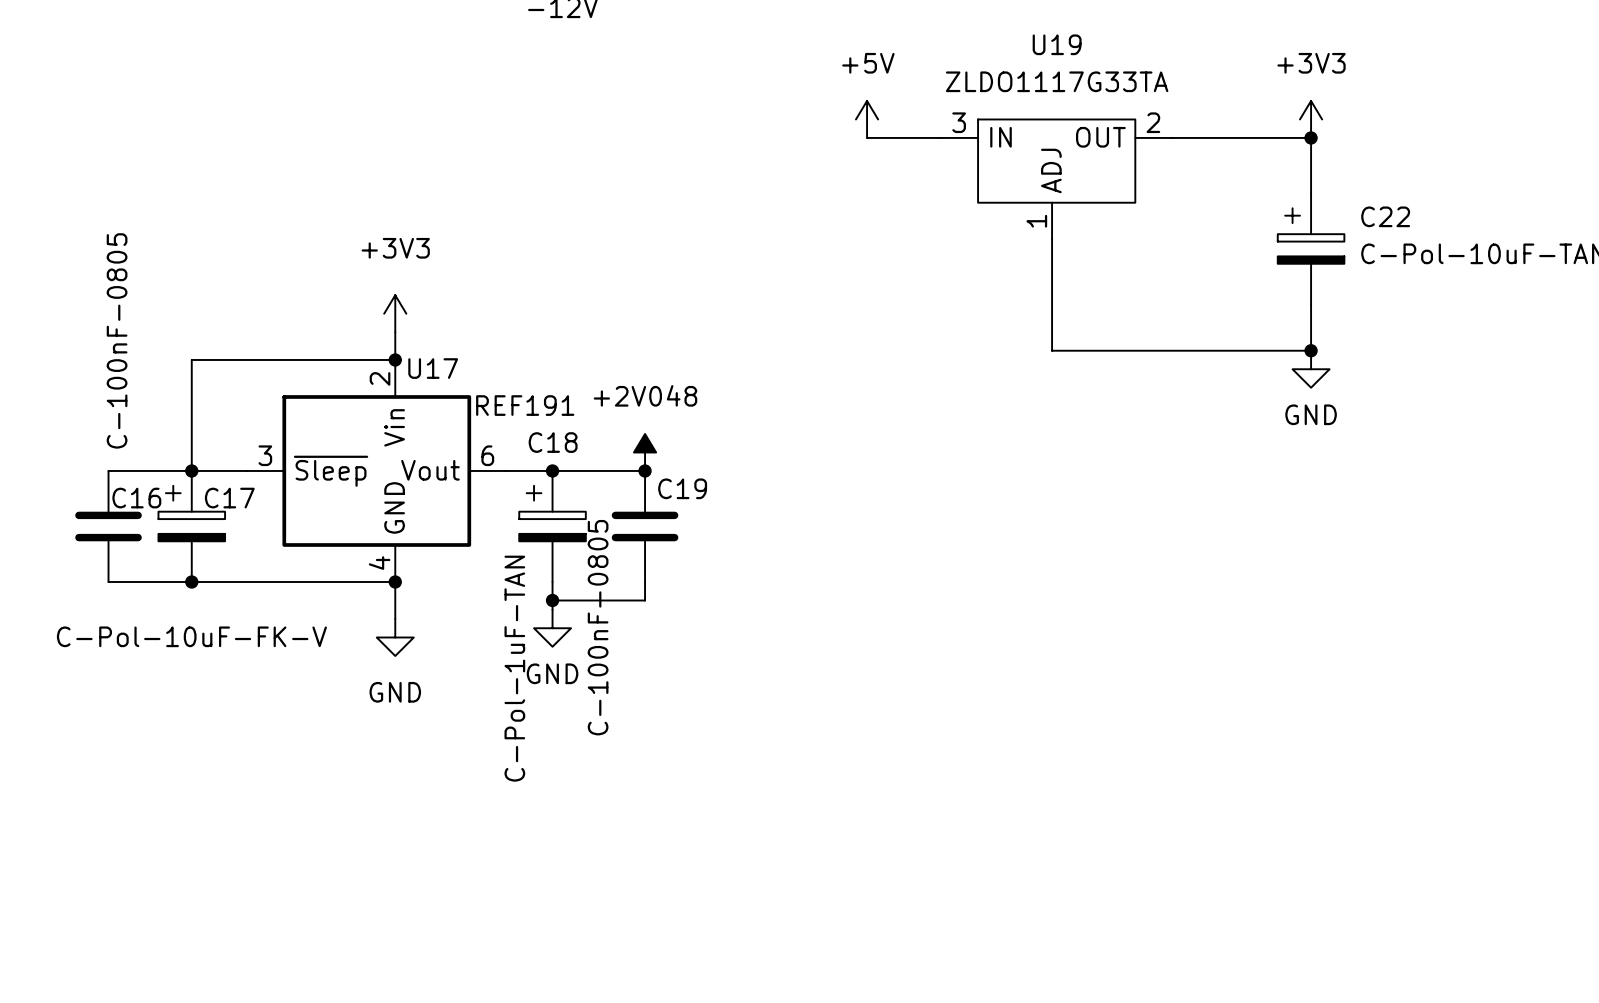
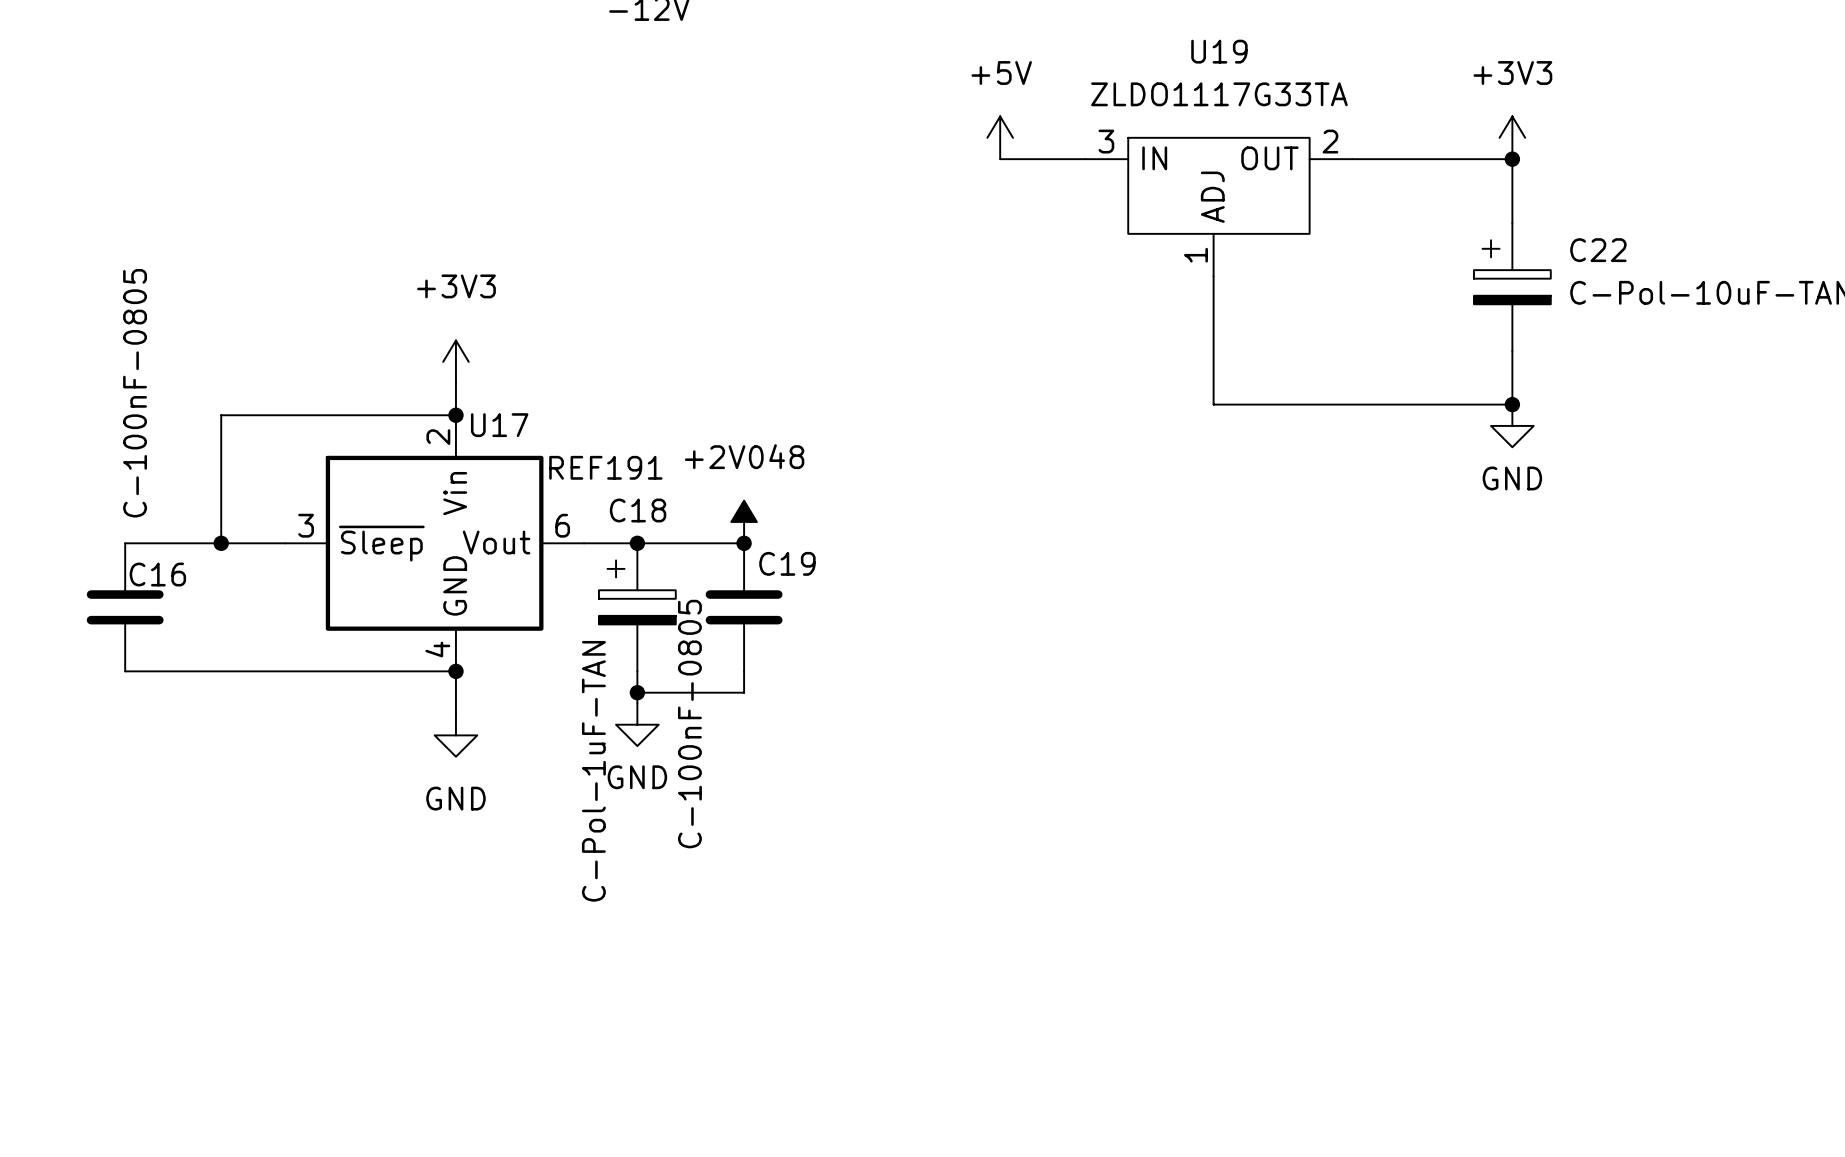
C17: C-Pol-10uF-FK-V (191, 526) -> none
junction: (191, 581) -> none

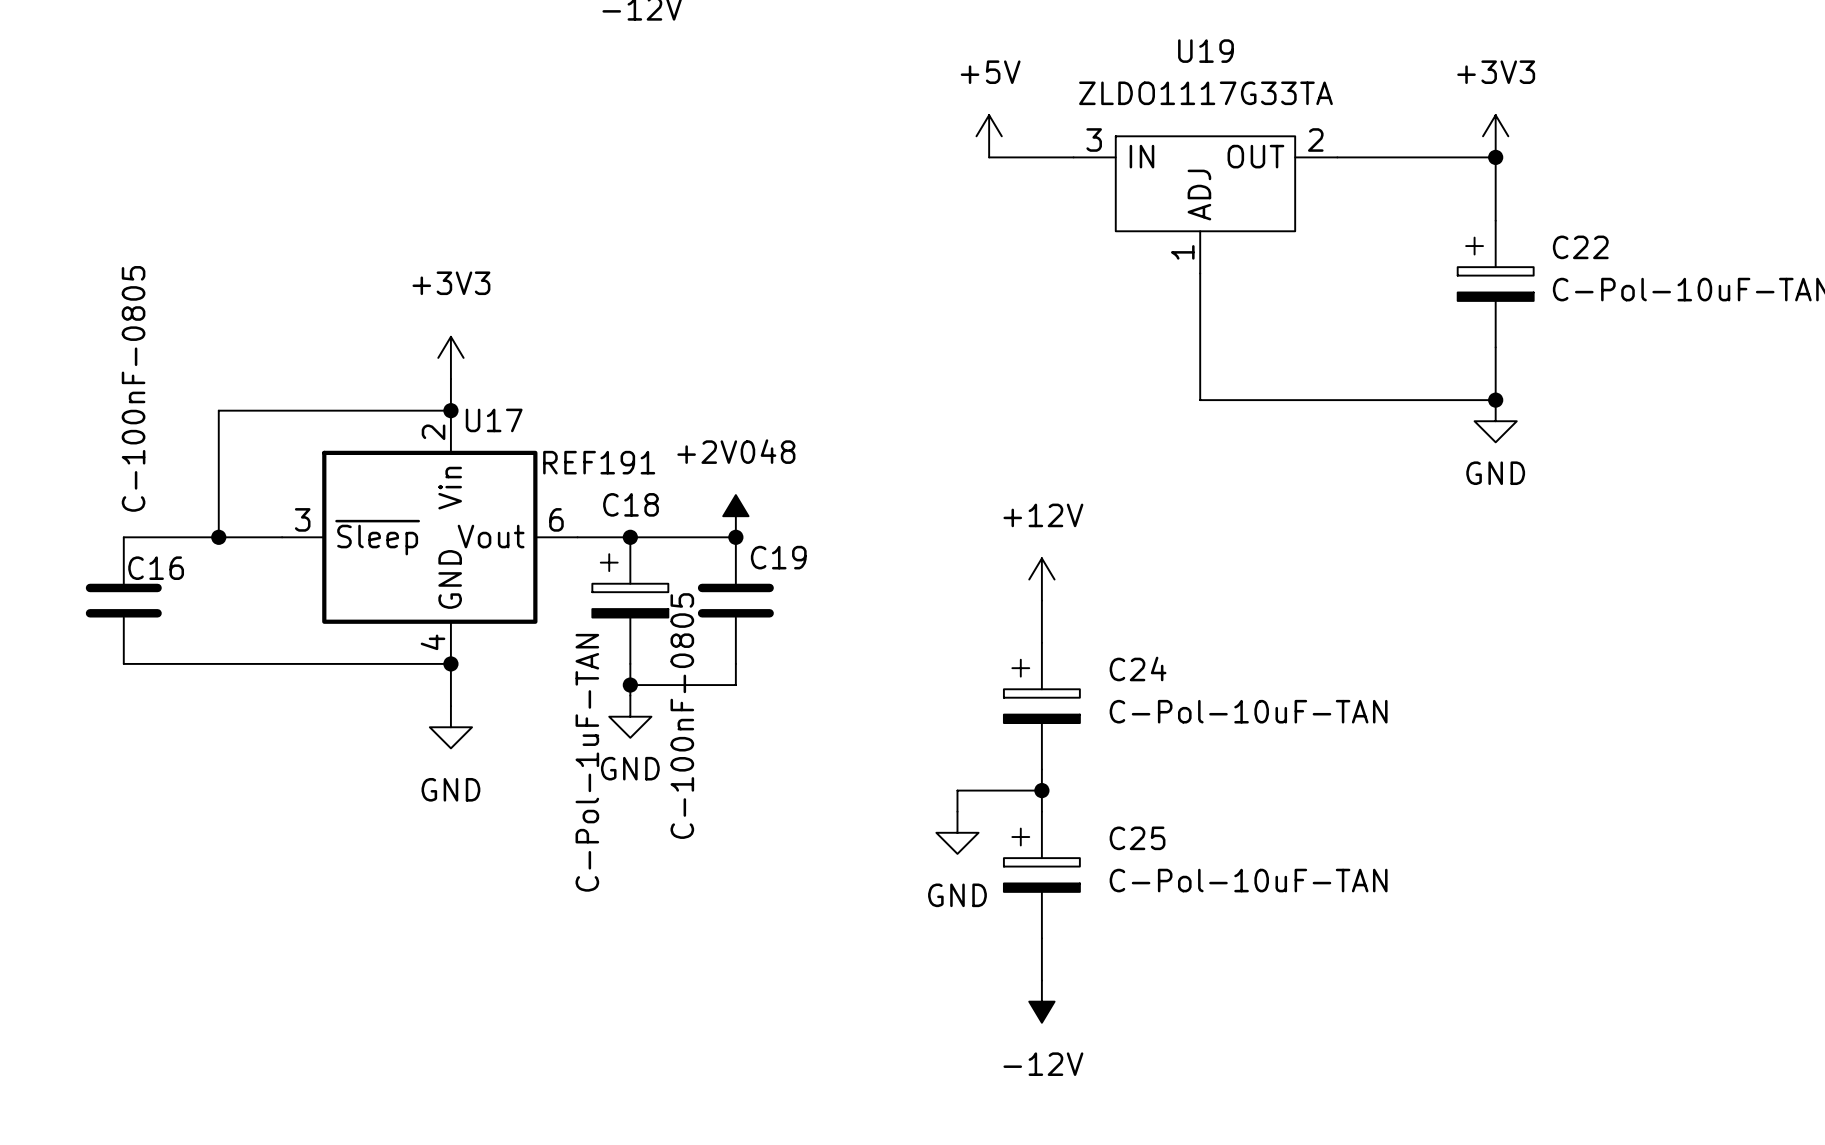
power symbol: none -> +12V (1041, 579)
wire: none -> (1041, 600) (1041, 642)
C24: none -> C-Pol-10uF-TAN (1041, 706)
wire: none -> (1041, 769) (1041, 811)
wire: none -> (1041, 790) (957, 790) (957, 811)
junction: none -> (1041, 790)
power symbol: none -> GND (957, 832)
C25: none -> C-Pol-10uF-TAN (1041, 875)
wire: none -> (1041, 938) (1041, 980)
power symbol: none -> -12V (1041, 1001)

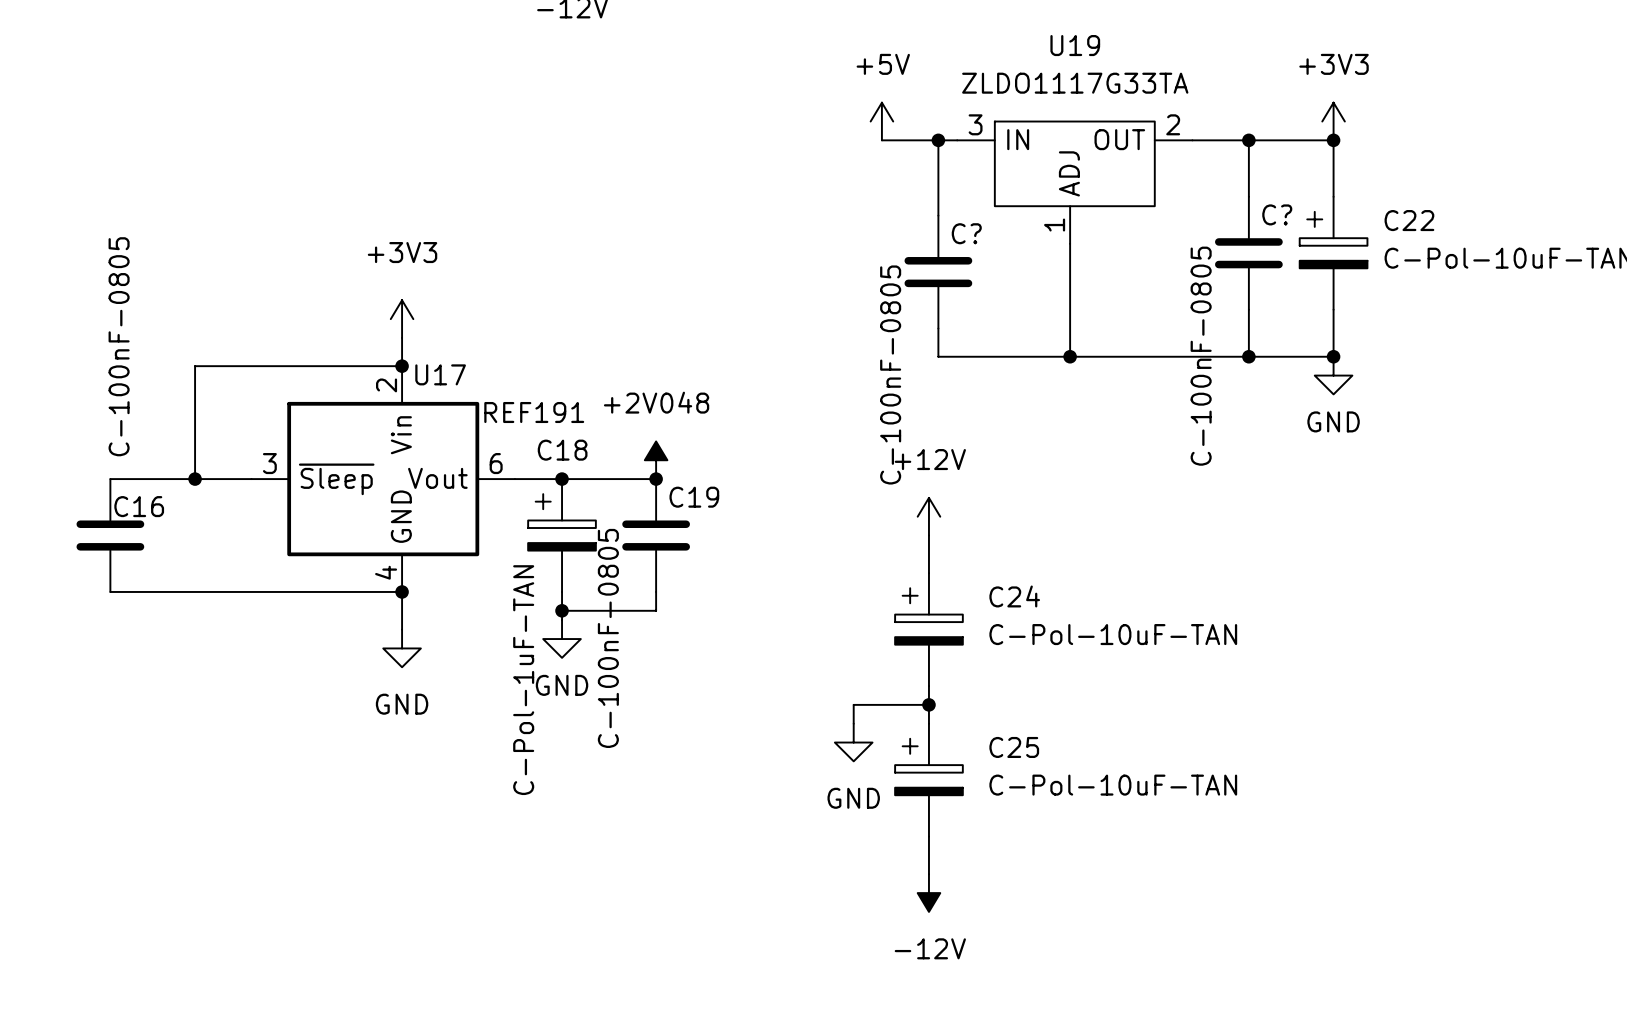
wire: none -> (938, 140) (938, 215)
junction: none -> (938, 140)
wire: none -> (1248, 140) (1248, 196)
junction: none -> (1248, 140)
C?: none -> C-100nF-0805 (1248, 253)
C?: none -> C-100nF-0805 (938, 272)
wire: none -> (1248, 309) (1248, 356)
wire: none -> (938, 328) (938, 356) (1070, 356)
junction: none -> (1070, 356)
junction: none -> (1248, 356)

